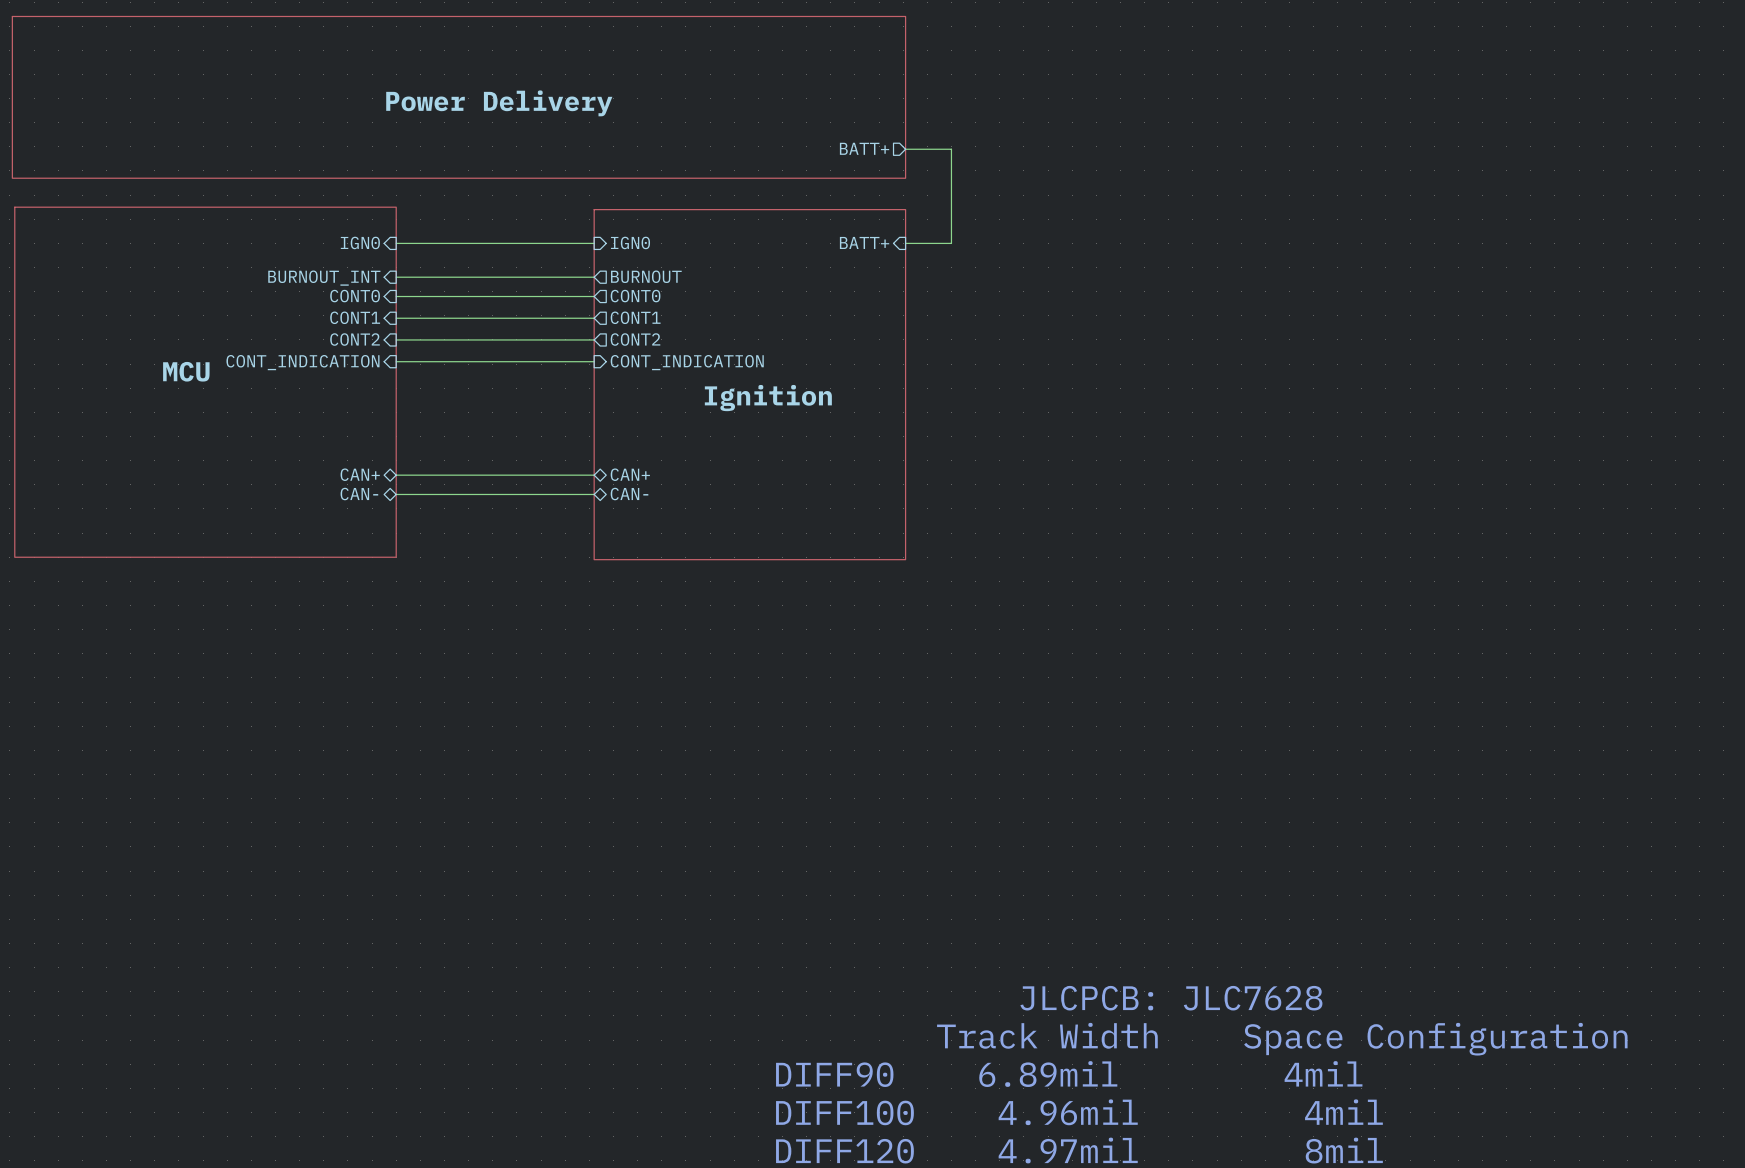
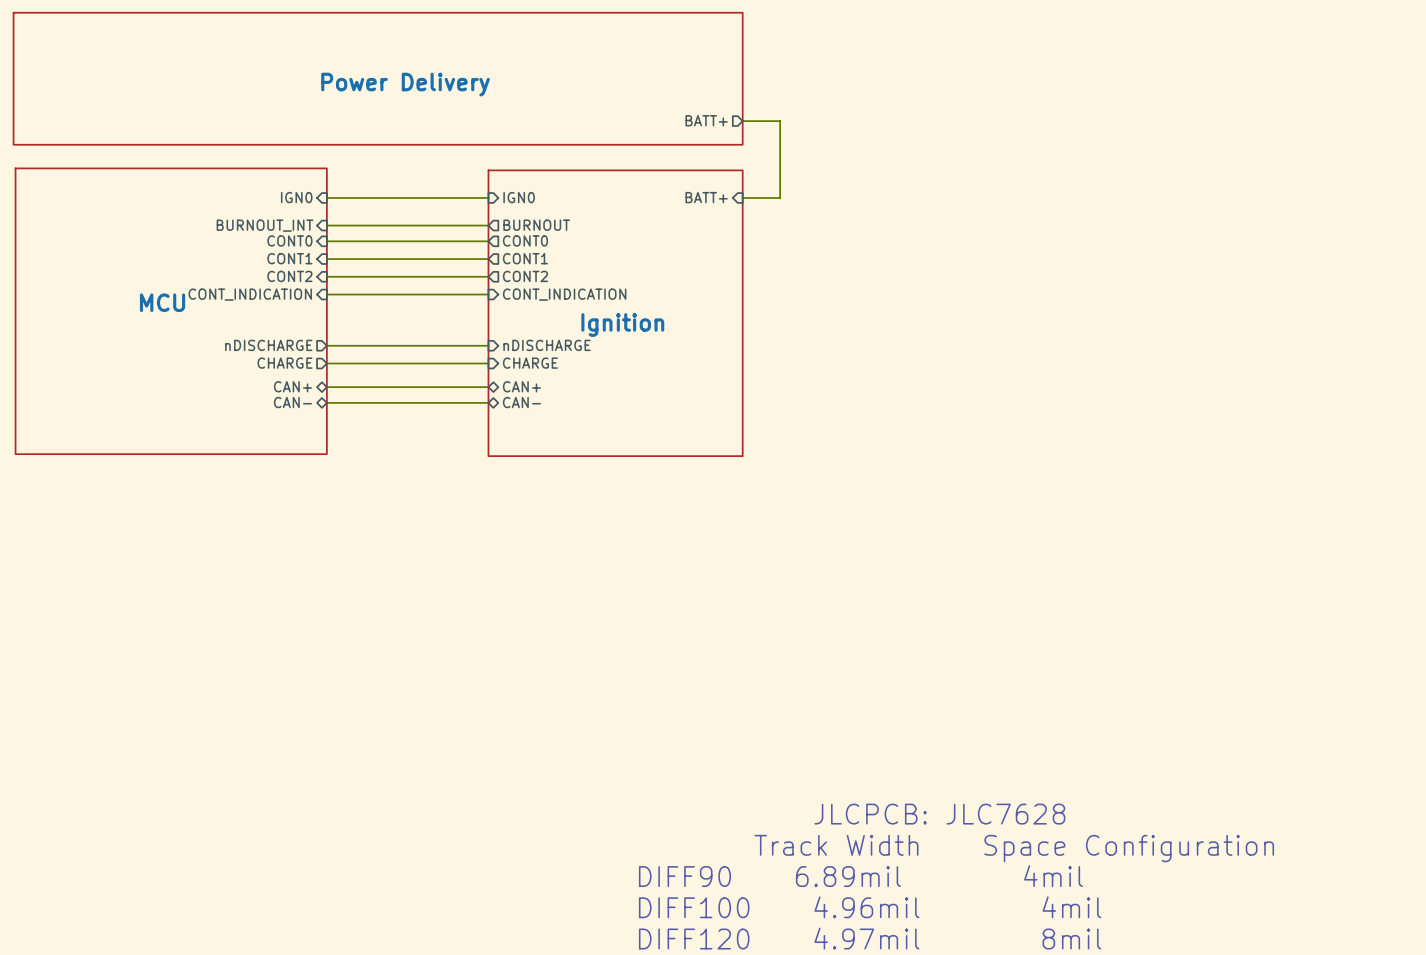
sheet pin: none -> nDISCHARGE (268, 345)
wire: none -> (326, 345) (488, 345)
sheet pin: none -> nDISCHARGE (547, 345)
sheet pin: none -> CHARGE (284, 363)
sheet pin: none -> CHARGE (530, 363)
wire: none -> (326, 363) (488, 363)

